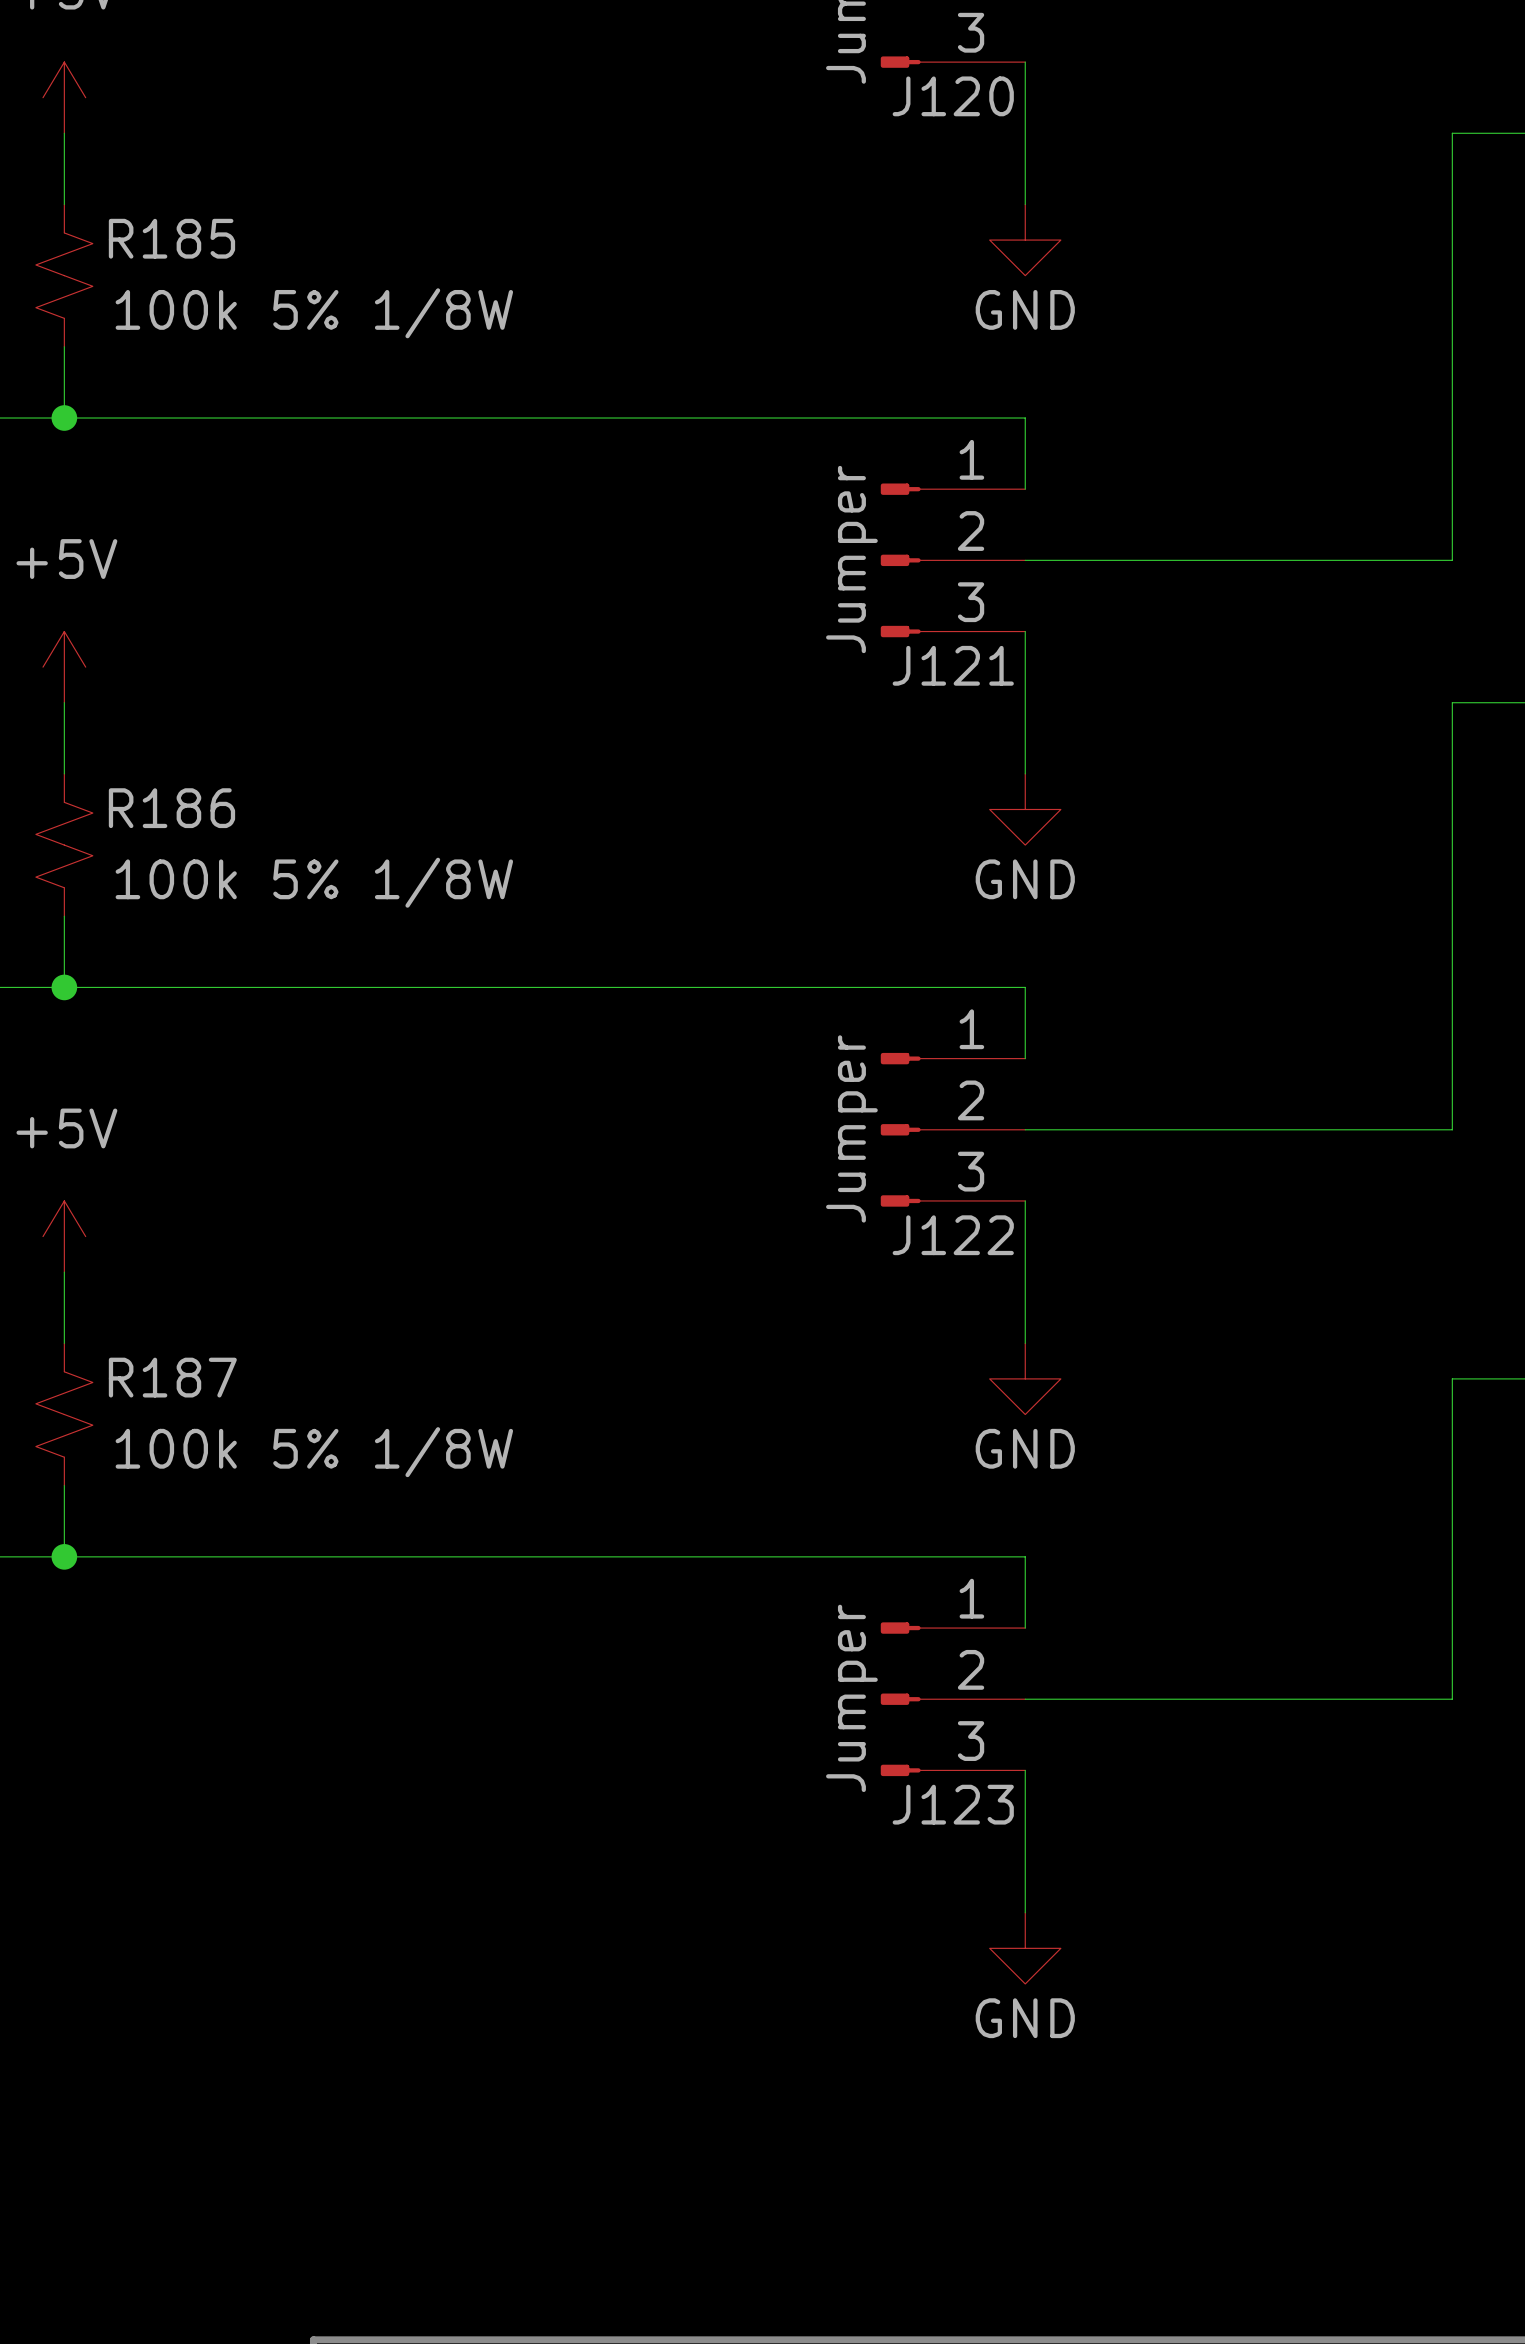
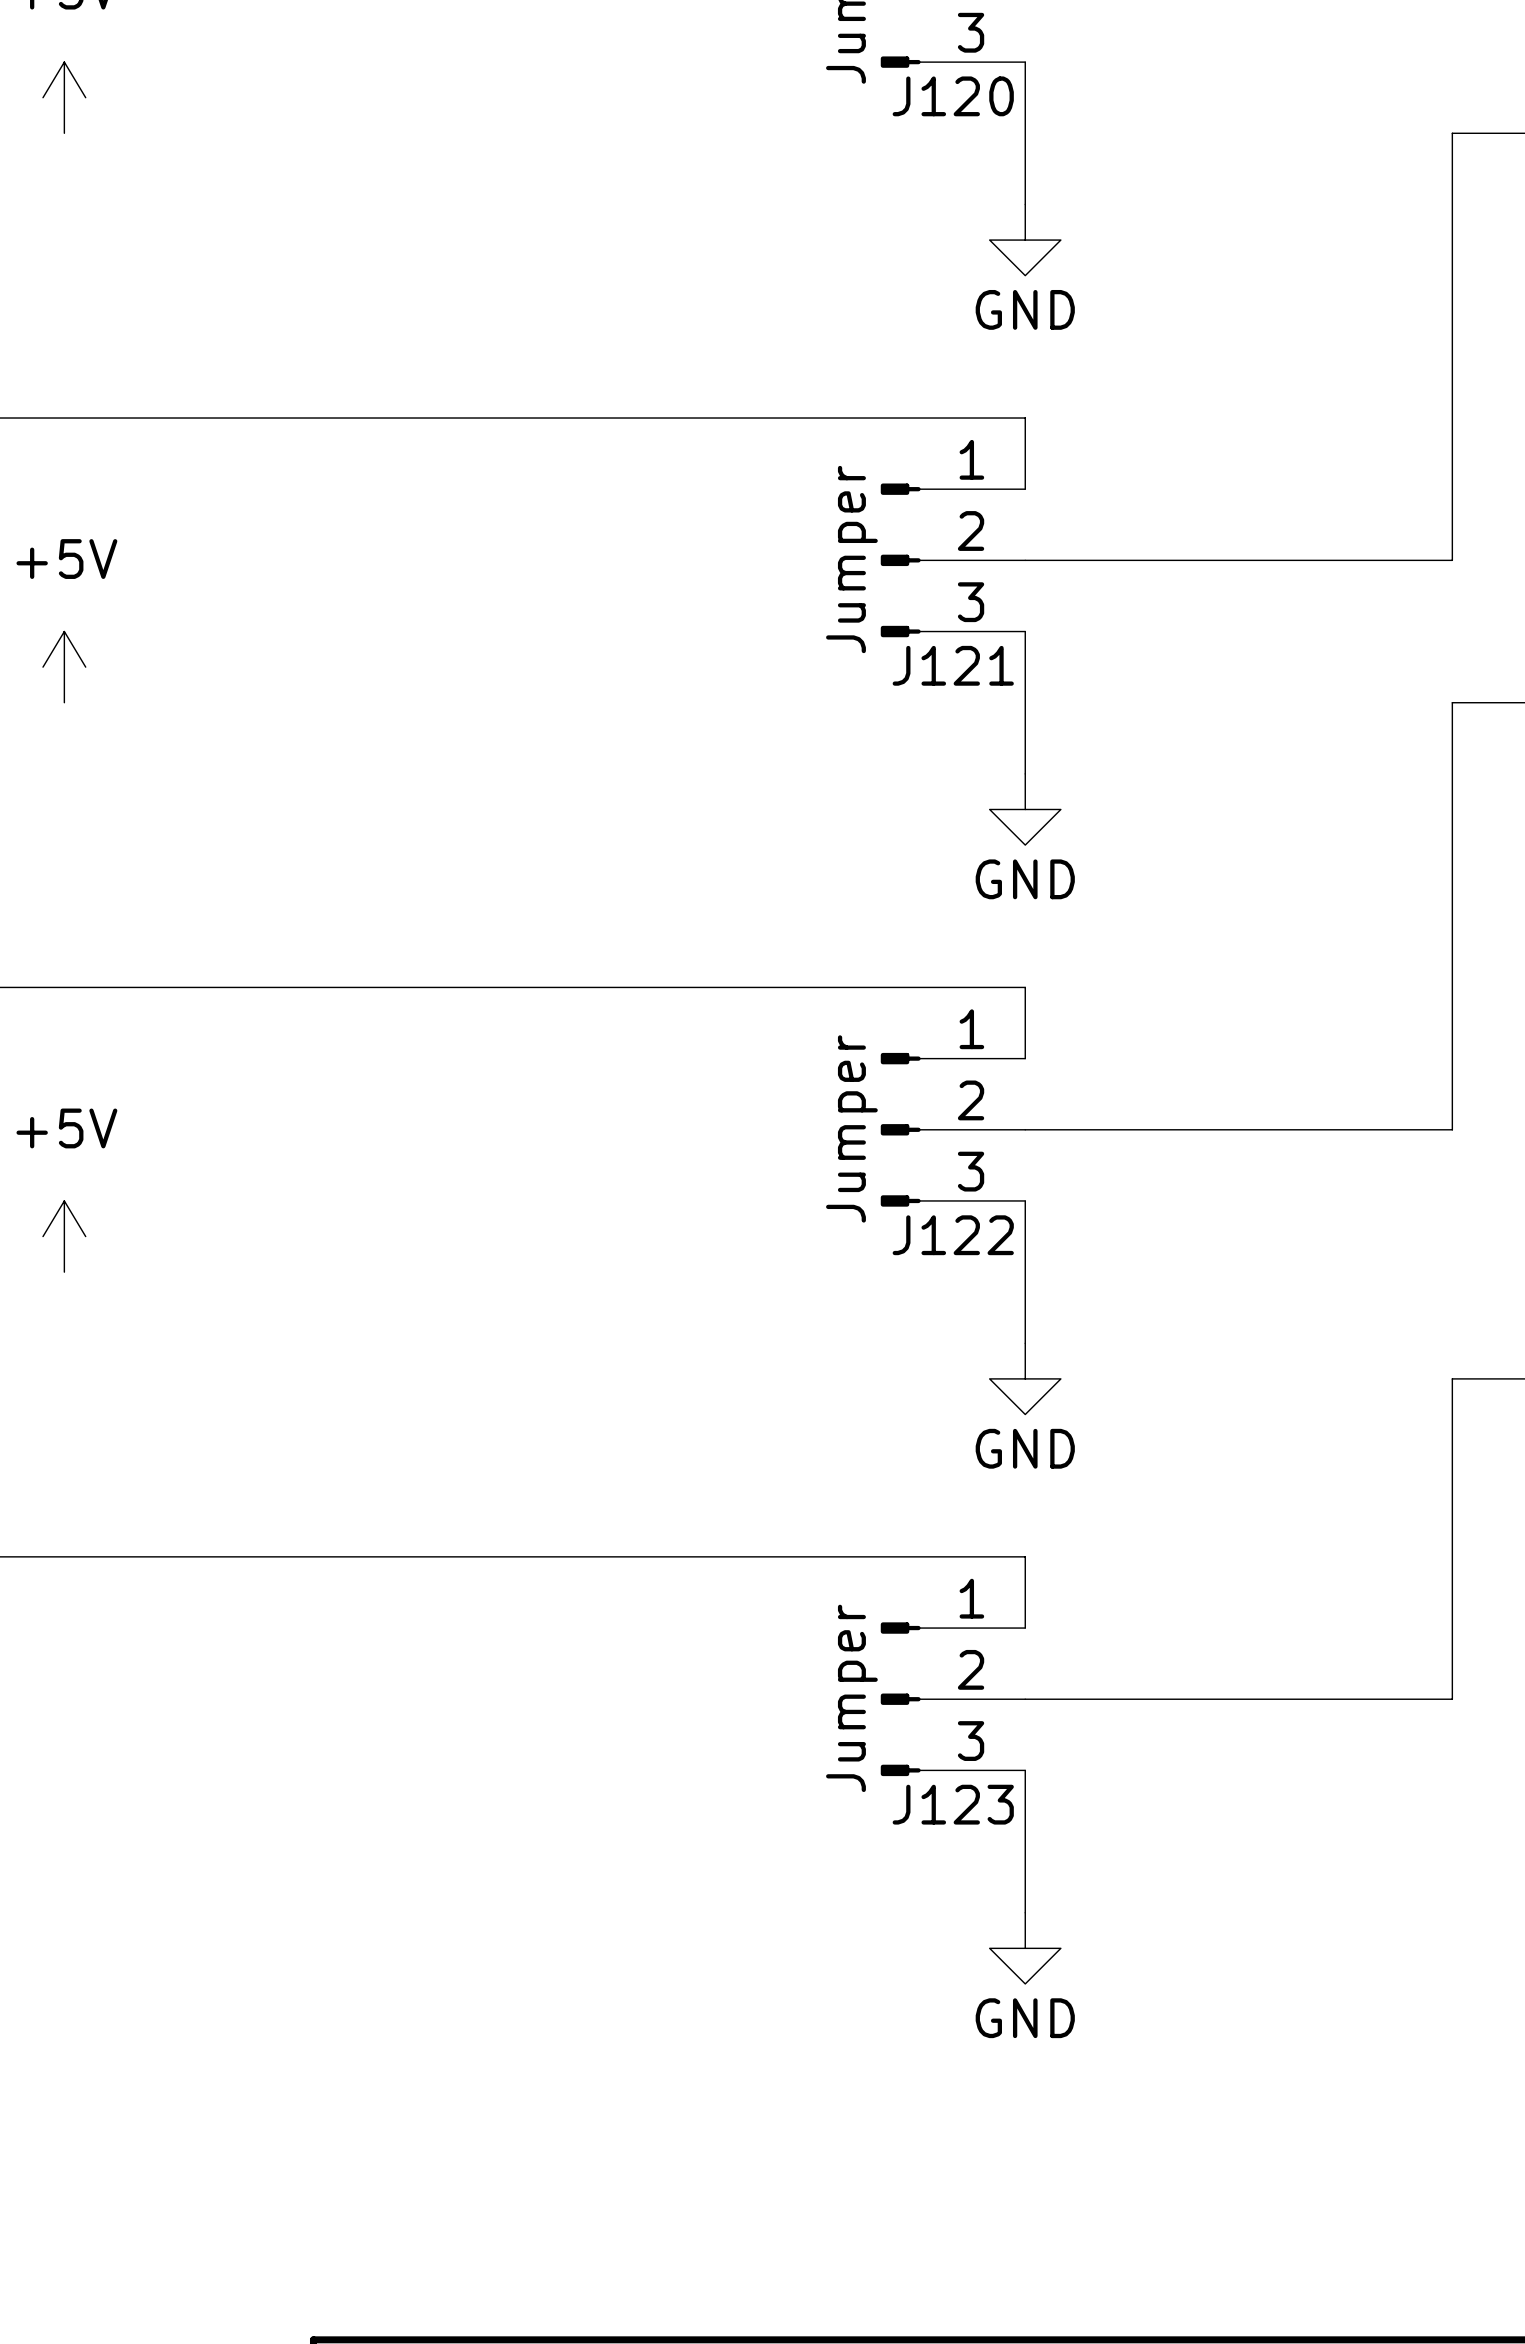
wire: (64, 133) (64, 204) -> none
R185: 100k 5% 1/8W (64, 275) -> none
wire: (64, 346) (64, 418) -> none
junction: (64, 418) -> none
wire: (64, 702) (64, 773) -> none
R186: 100k 5% 1/8W (64, 845) -> none
wire: (64, 916) (64, 987) -> none
junction: (64, 987) -> none
wire: (64, 1272) (64, 1343) -> none
R187: 100k 5% 1/8W (64, 1414) -> none
wire: (64, 1485) (64, 1556) -> none
junction: (64, 1556) -> none

